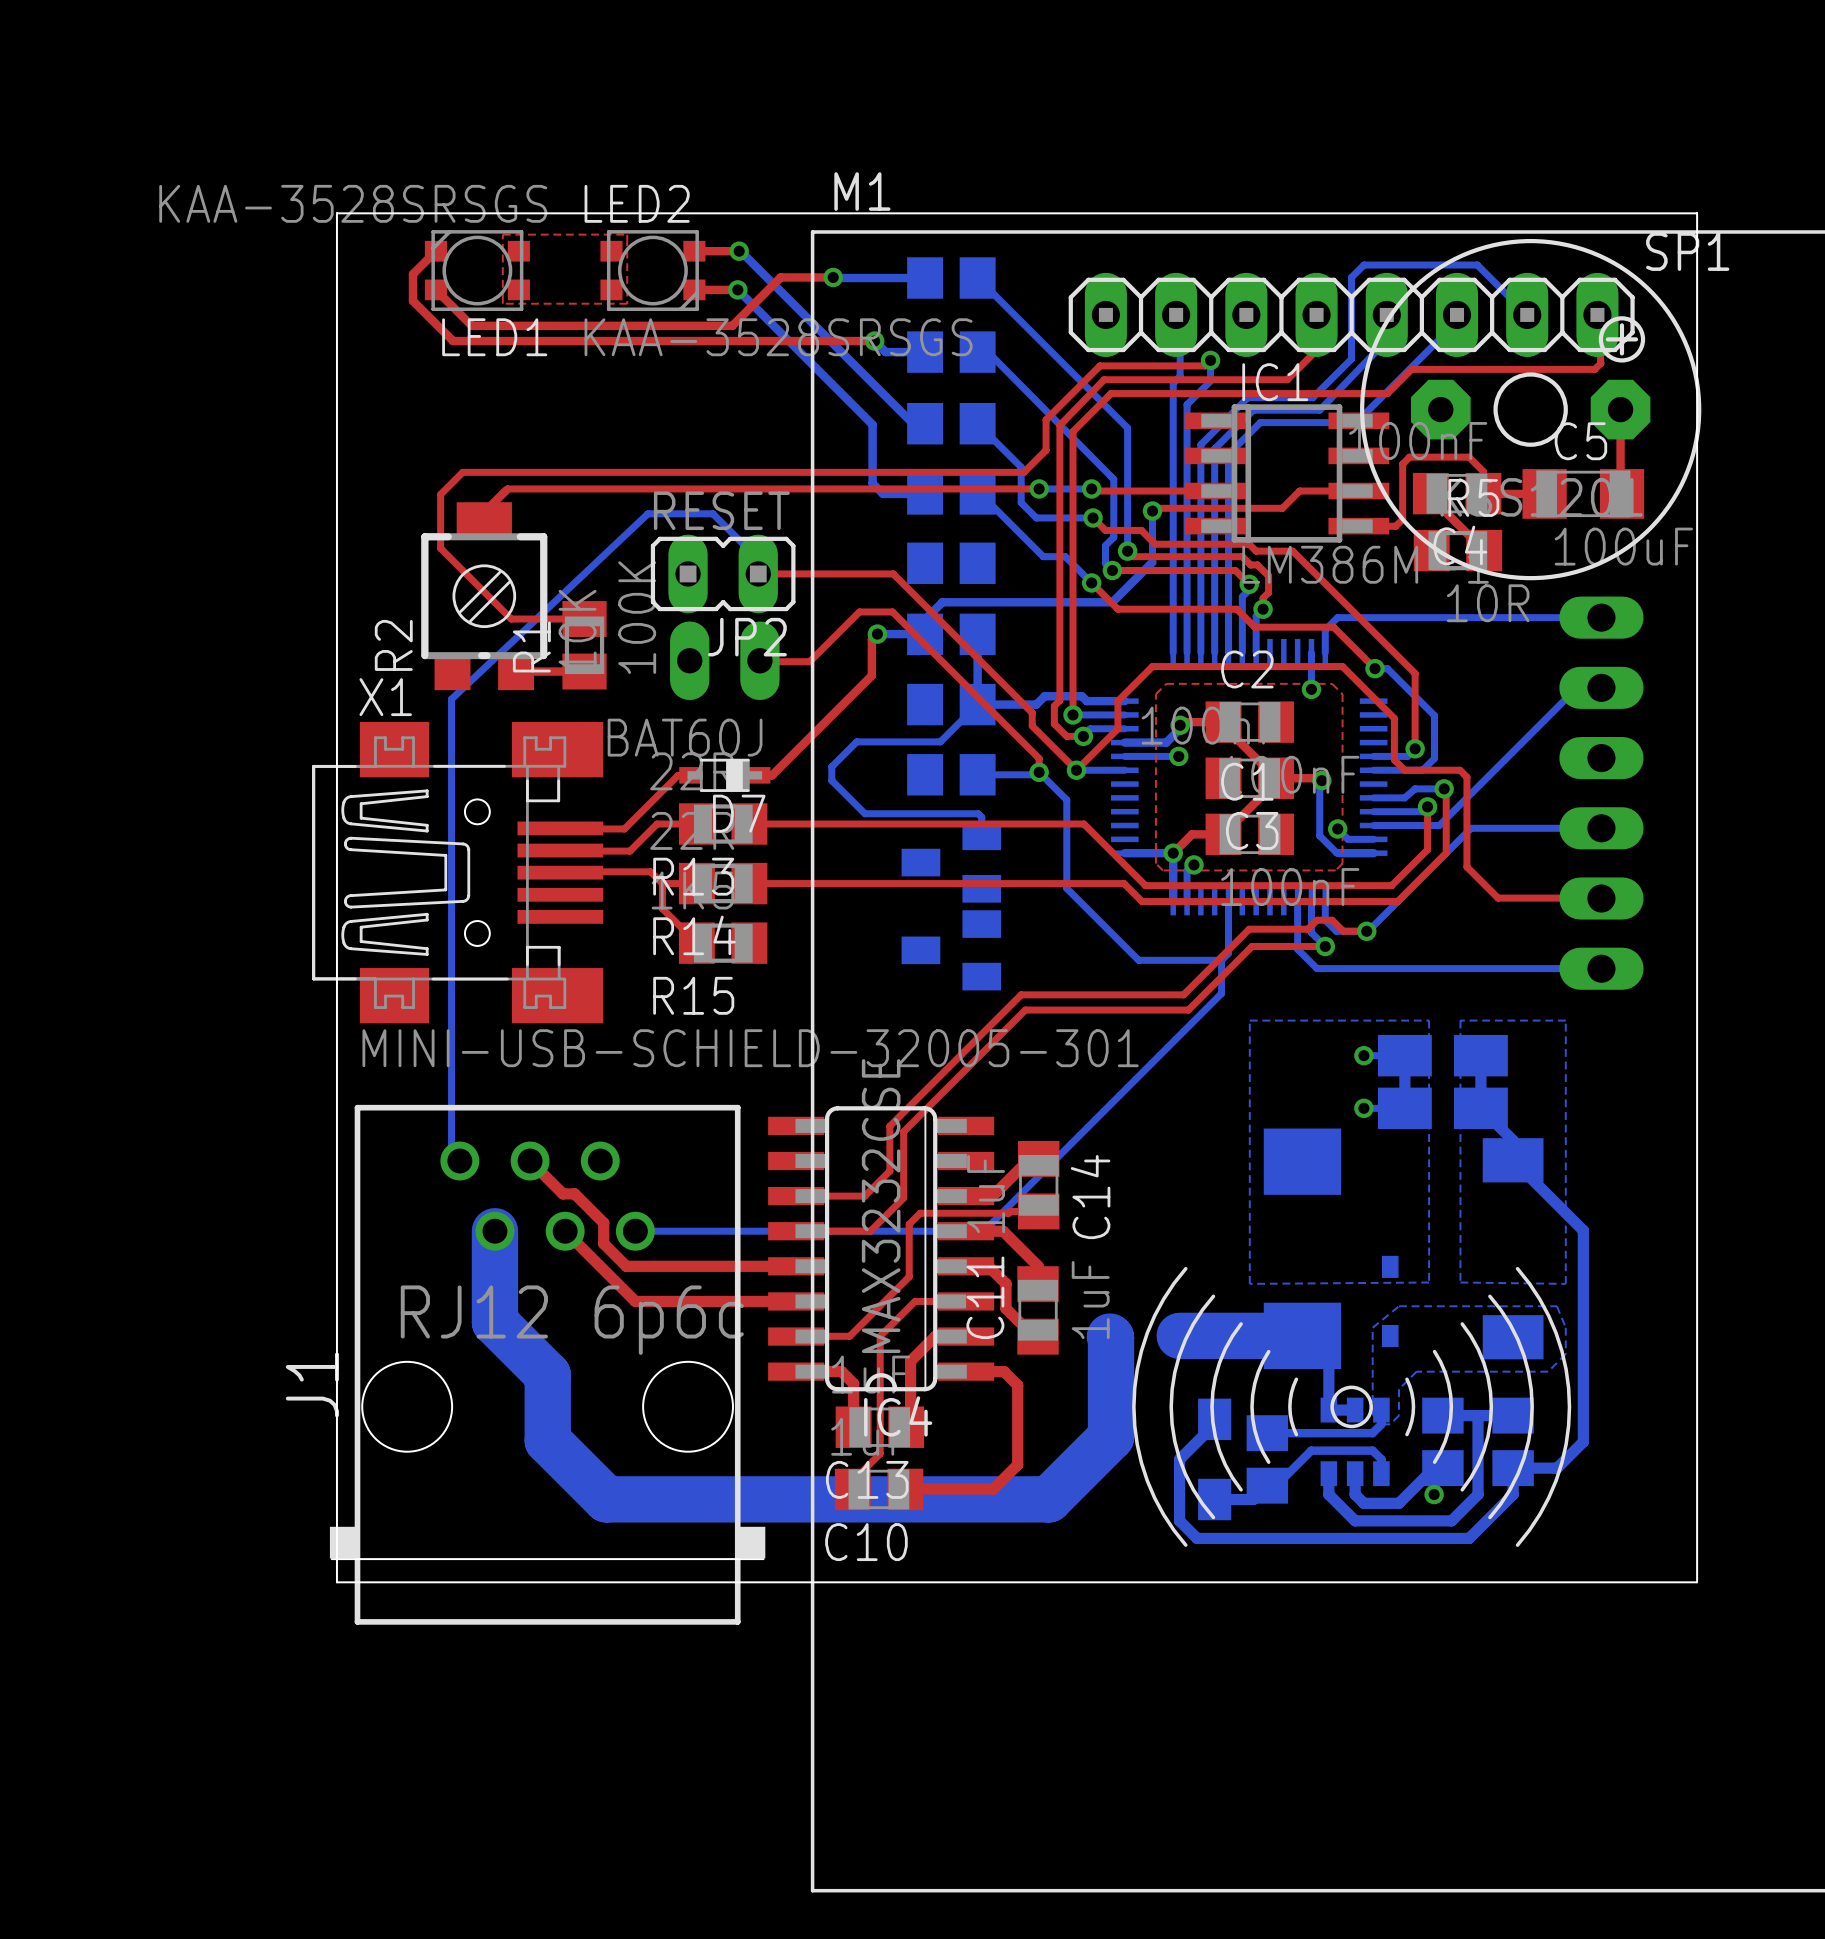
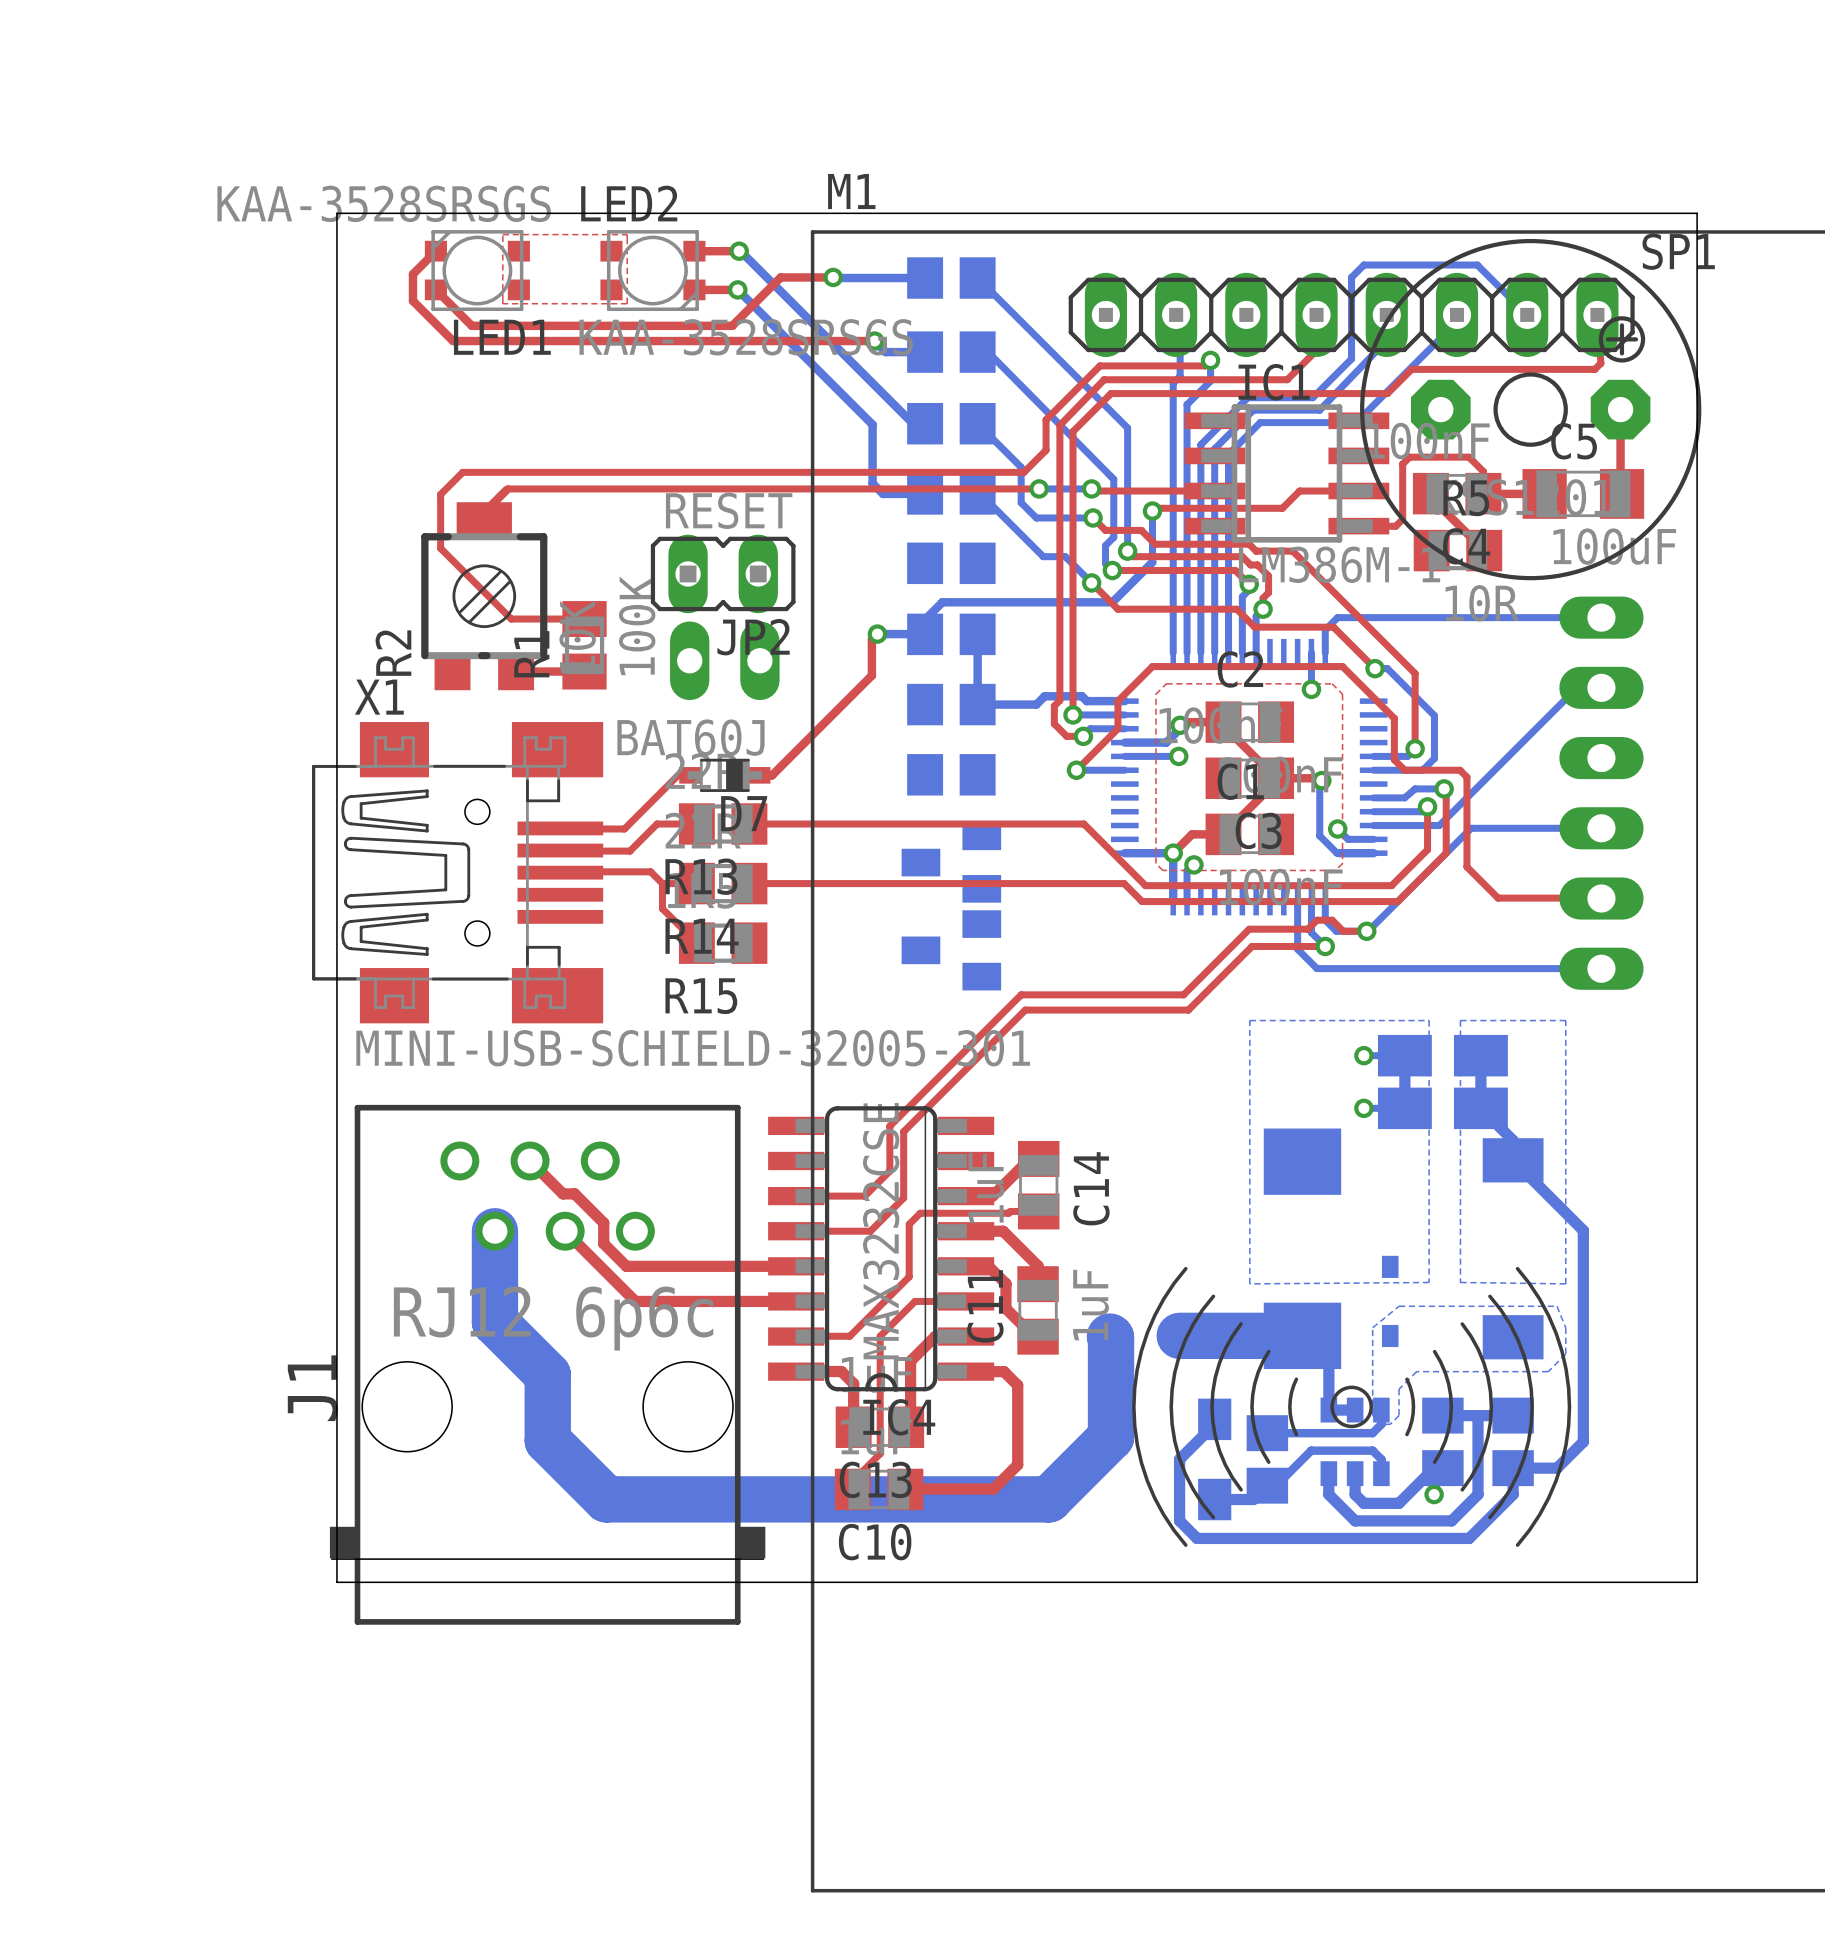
bottom track: (758, 573) (754, 570) (754, 555) (712, 513) (647, 513) (451, 699) (451, 1152) (459, 1161) -> none
top track: (758, 573) (893, 573) (1032, 712) (1032, 726) (1076, 770) -> none
top track: (759, 660) (809, 661) (859, 611) (892, 611) (1039, 758) (1039, 772) -> none
bottom track: (977, 704) (940, 741) (856, 741) (831, 766) (831, 780) (864, 813) (978, 813) (981, 817) (981, 836) -> none
via: (1039, 772) -> none
bottom track: (977, 774) (1036, 774) (1039, 772) (1066, 799) (1066, 888) (1138, 960) (1221, 960) -> none
bottom track: (1228, 901) (1228, 953) (1221, 960) -> none
bottom track: (1221, 960) (1221, 993) (983, 1231) (635, 1231) -> none

